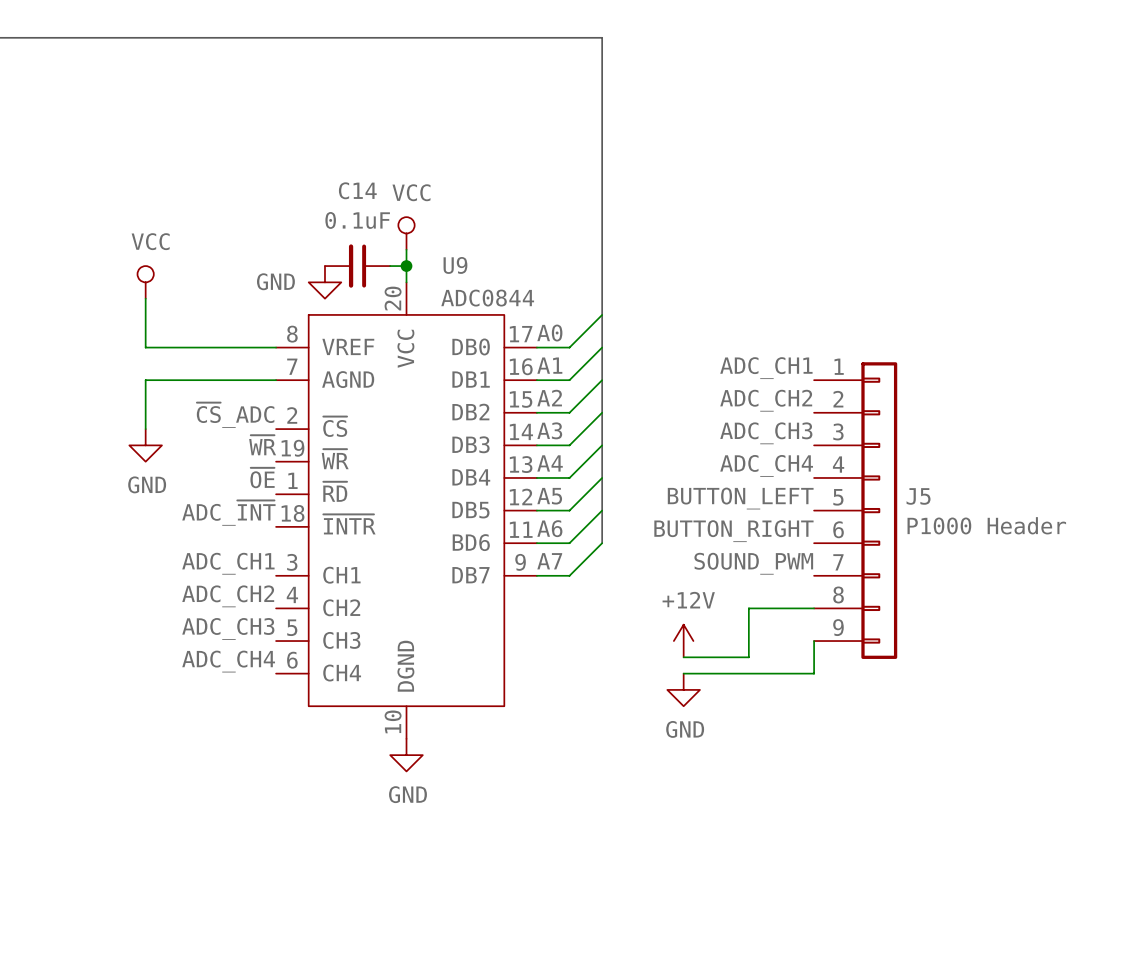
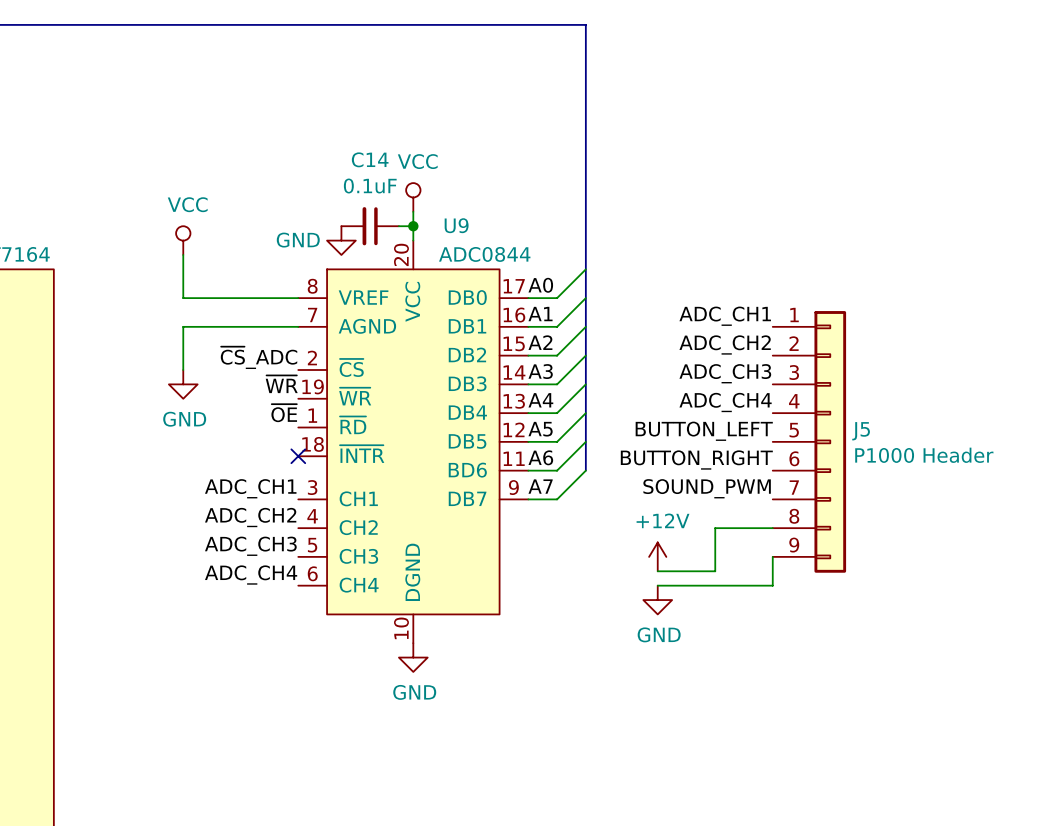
label: ADC_~{INT} (228, 513) -> none
no-connect mark: none -> (298, 456)

